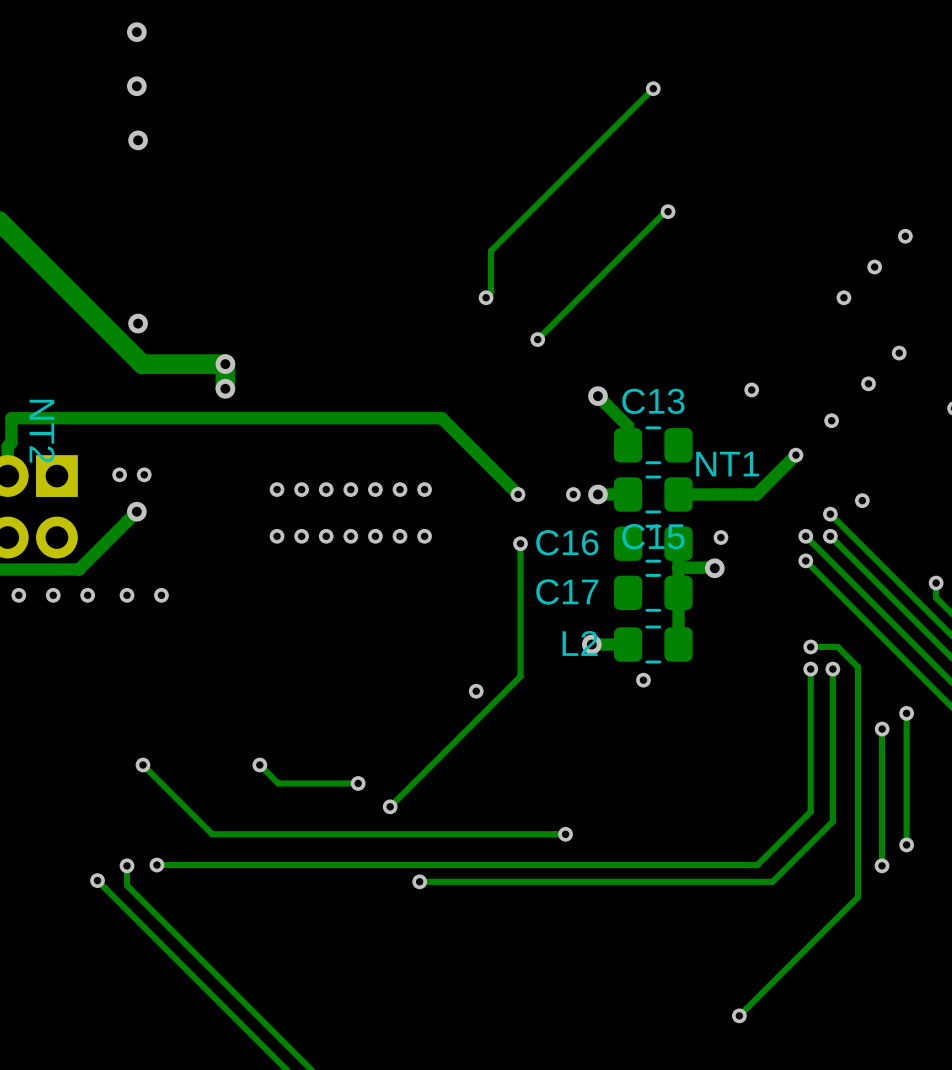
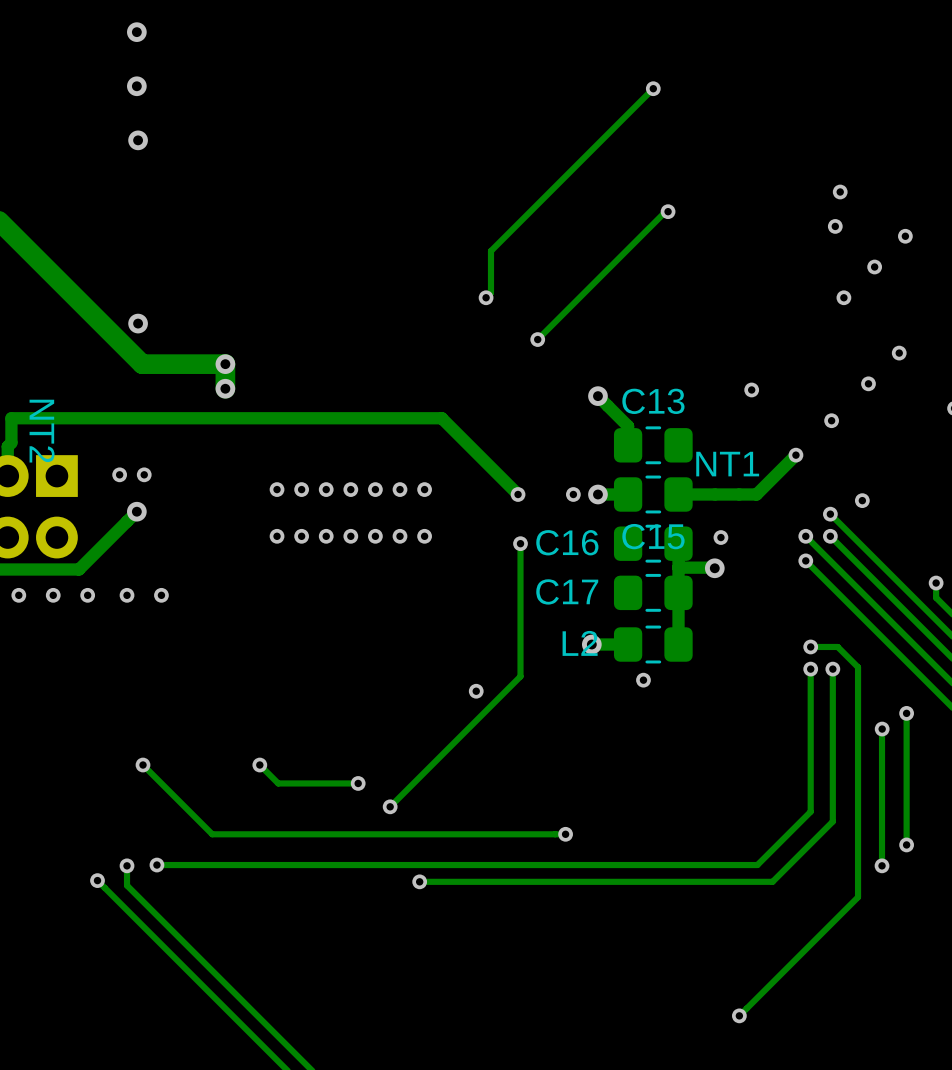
via: none -> (840, 192)
via: none -> (835, 226)

